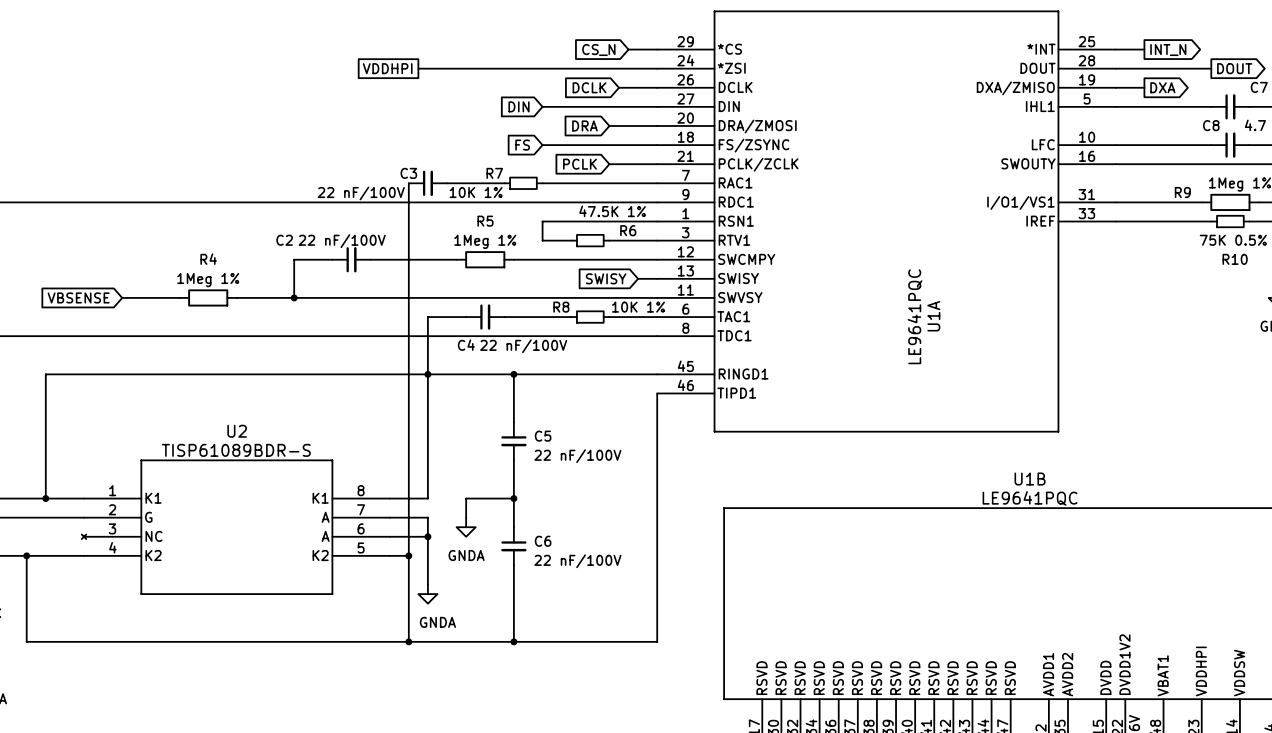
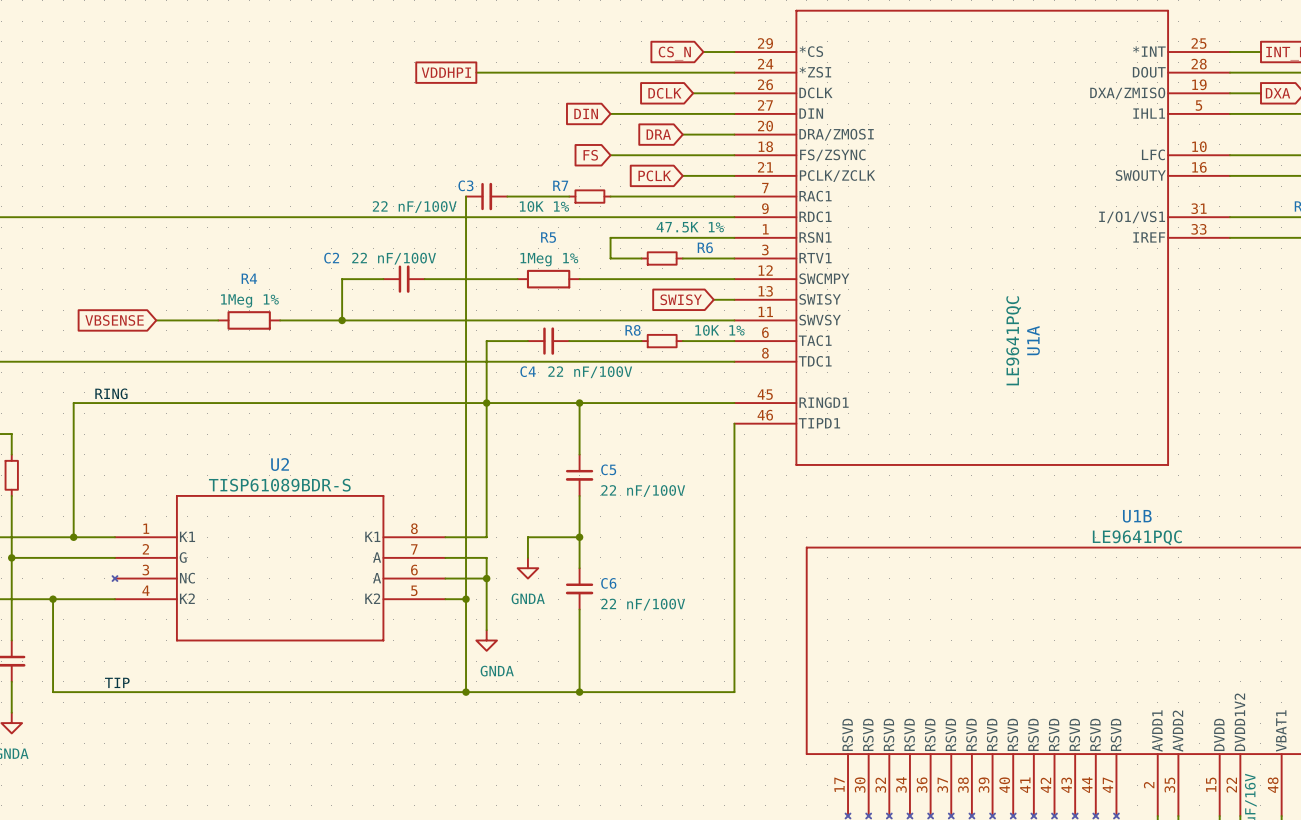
label: none -> RING (111, 393)
label: none -> TIP (117, 682)

